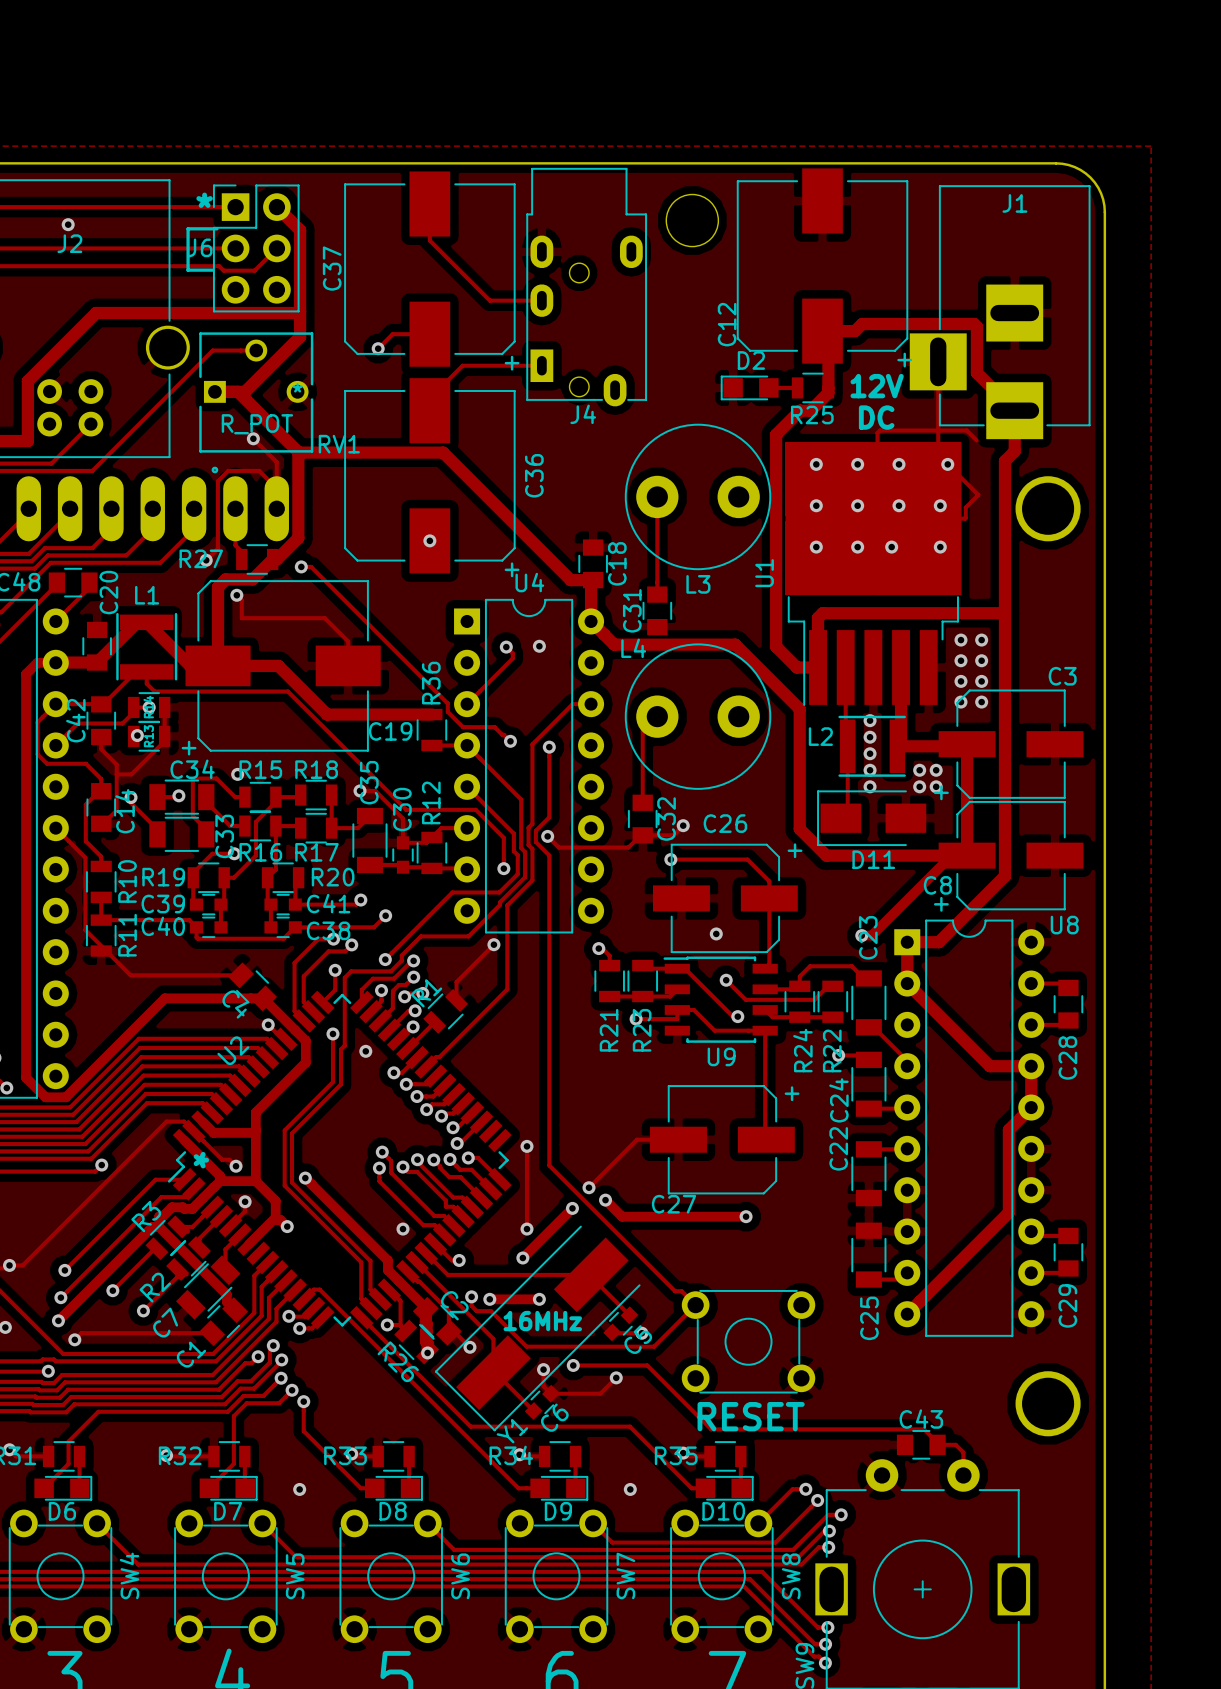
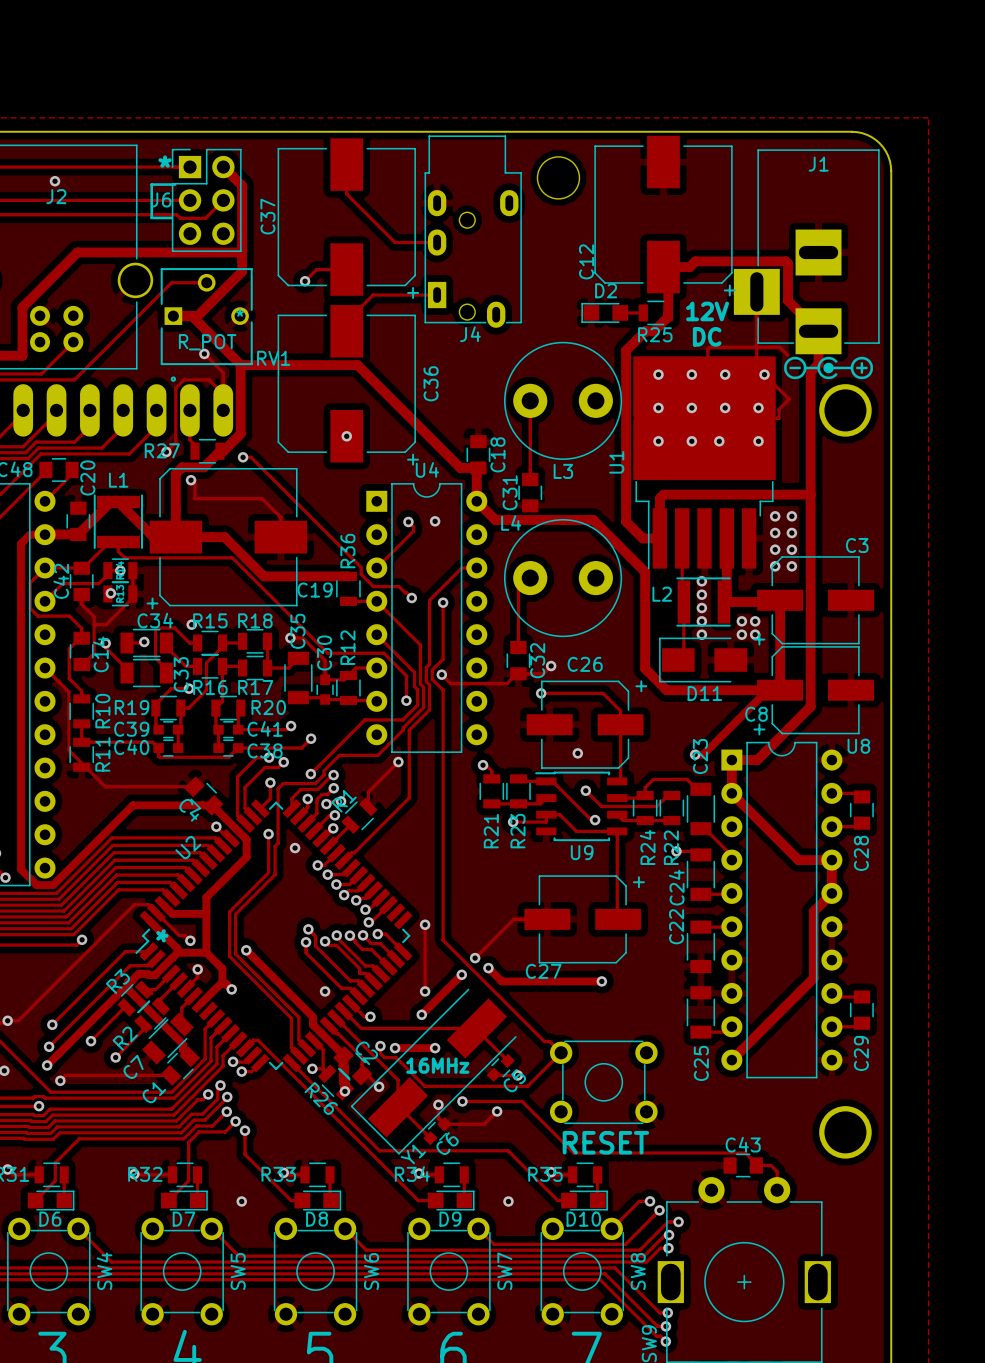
drawing: none -> [784, 356, 873, 380]

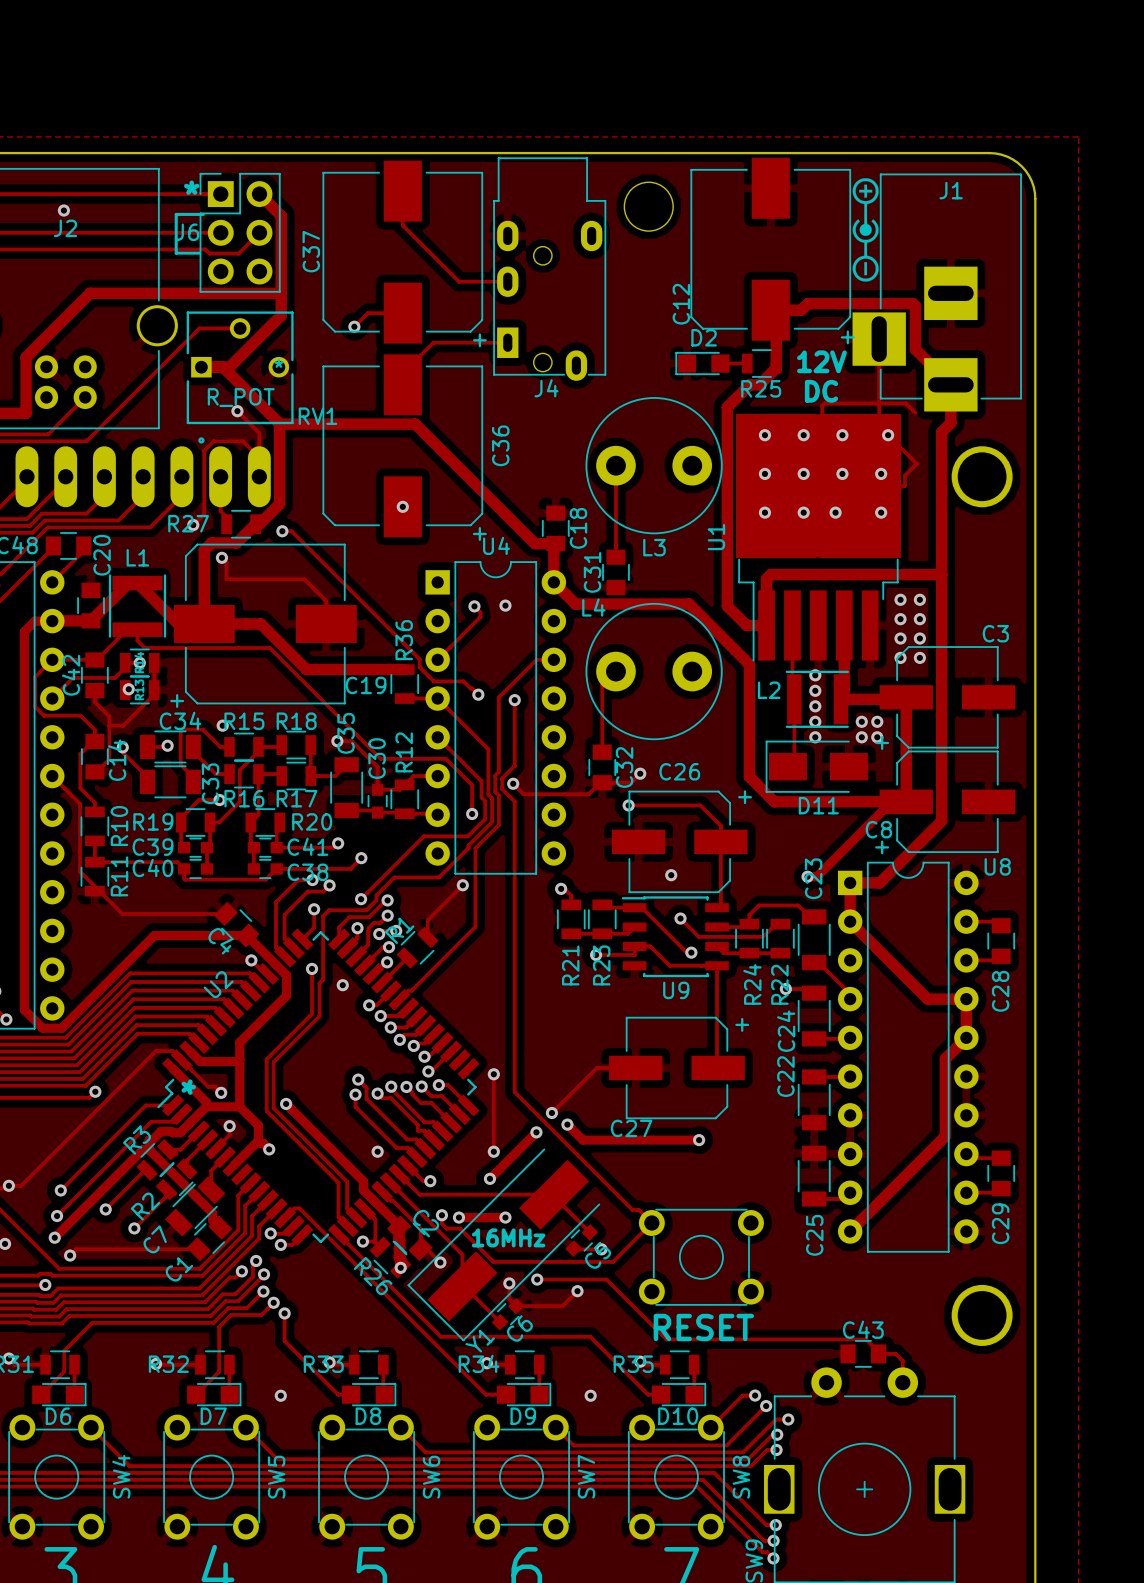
drawing: none -> [852, 178, 879, 282]
drawing: [784, 356, 873, 380] -> none

